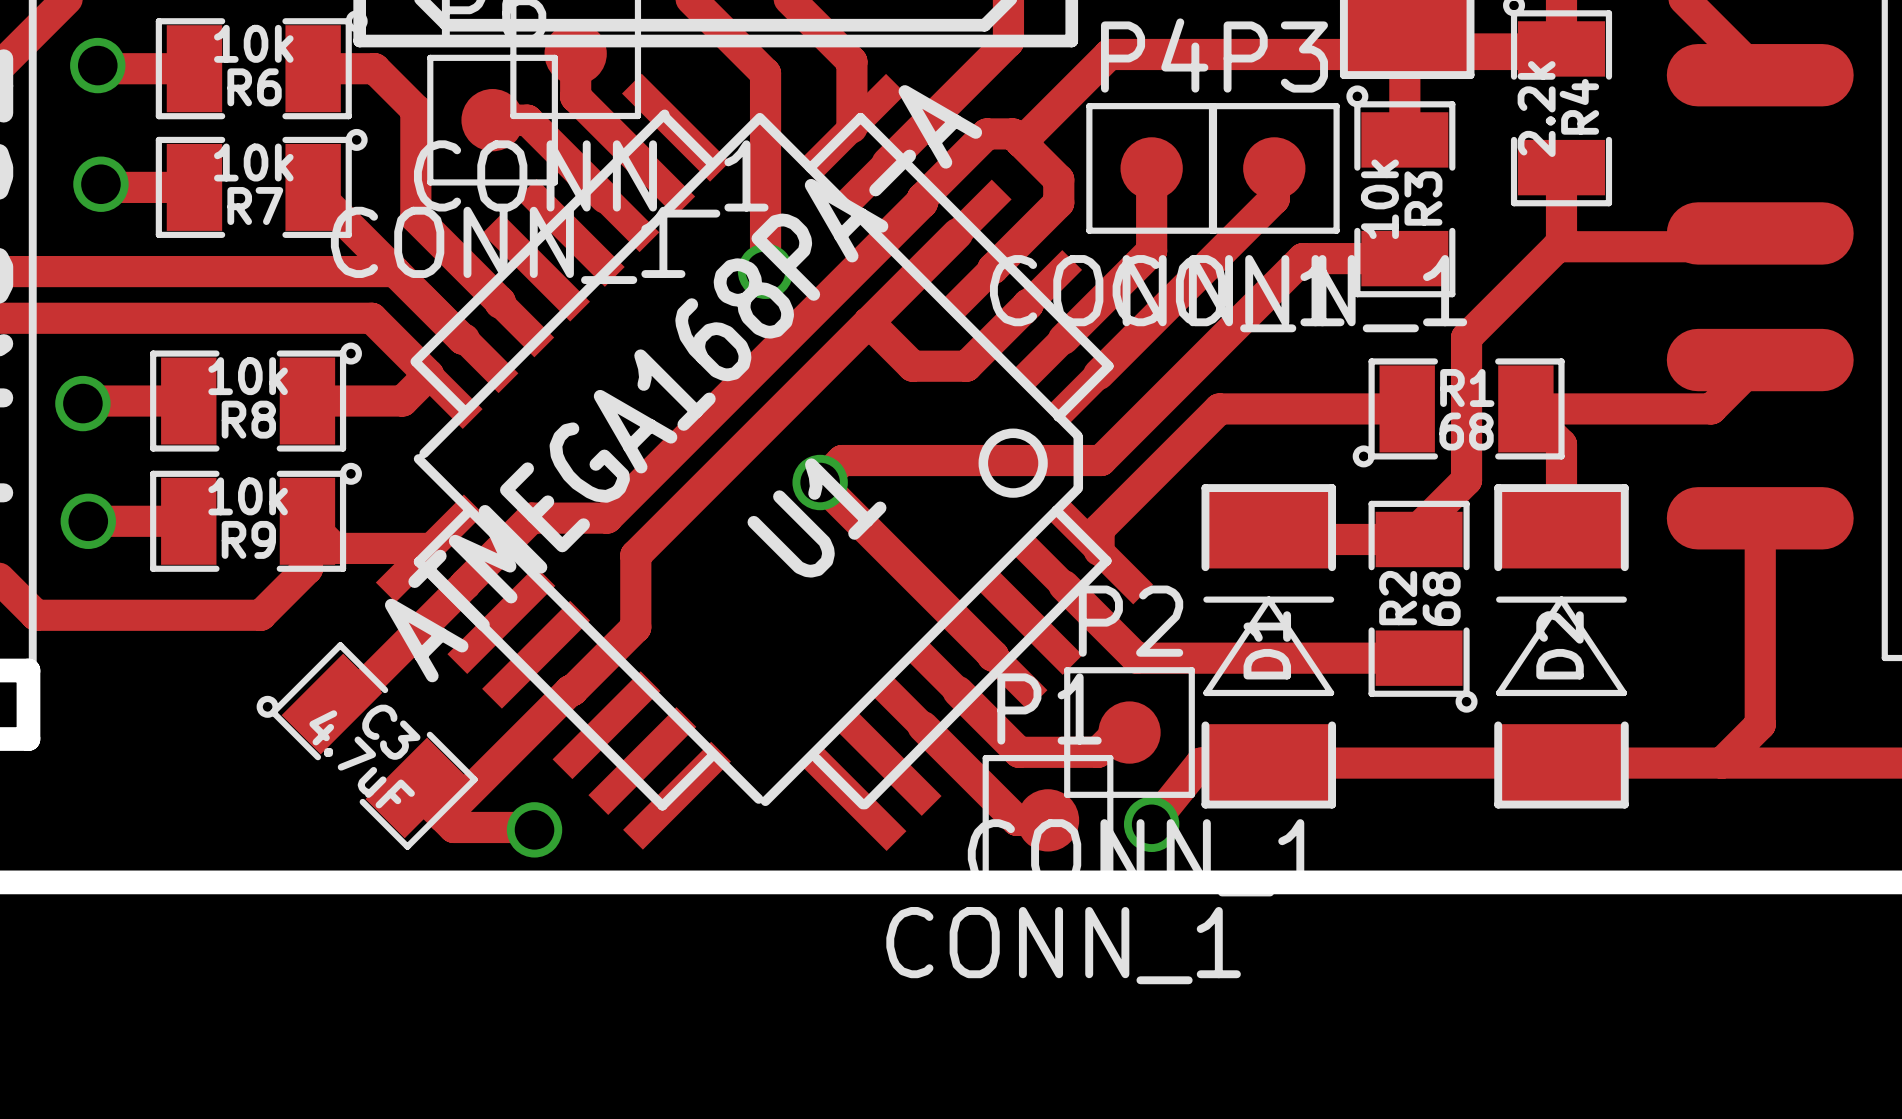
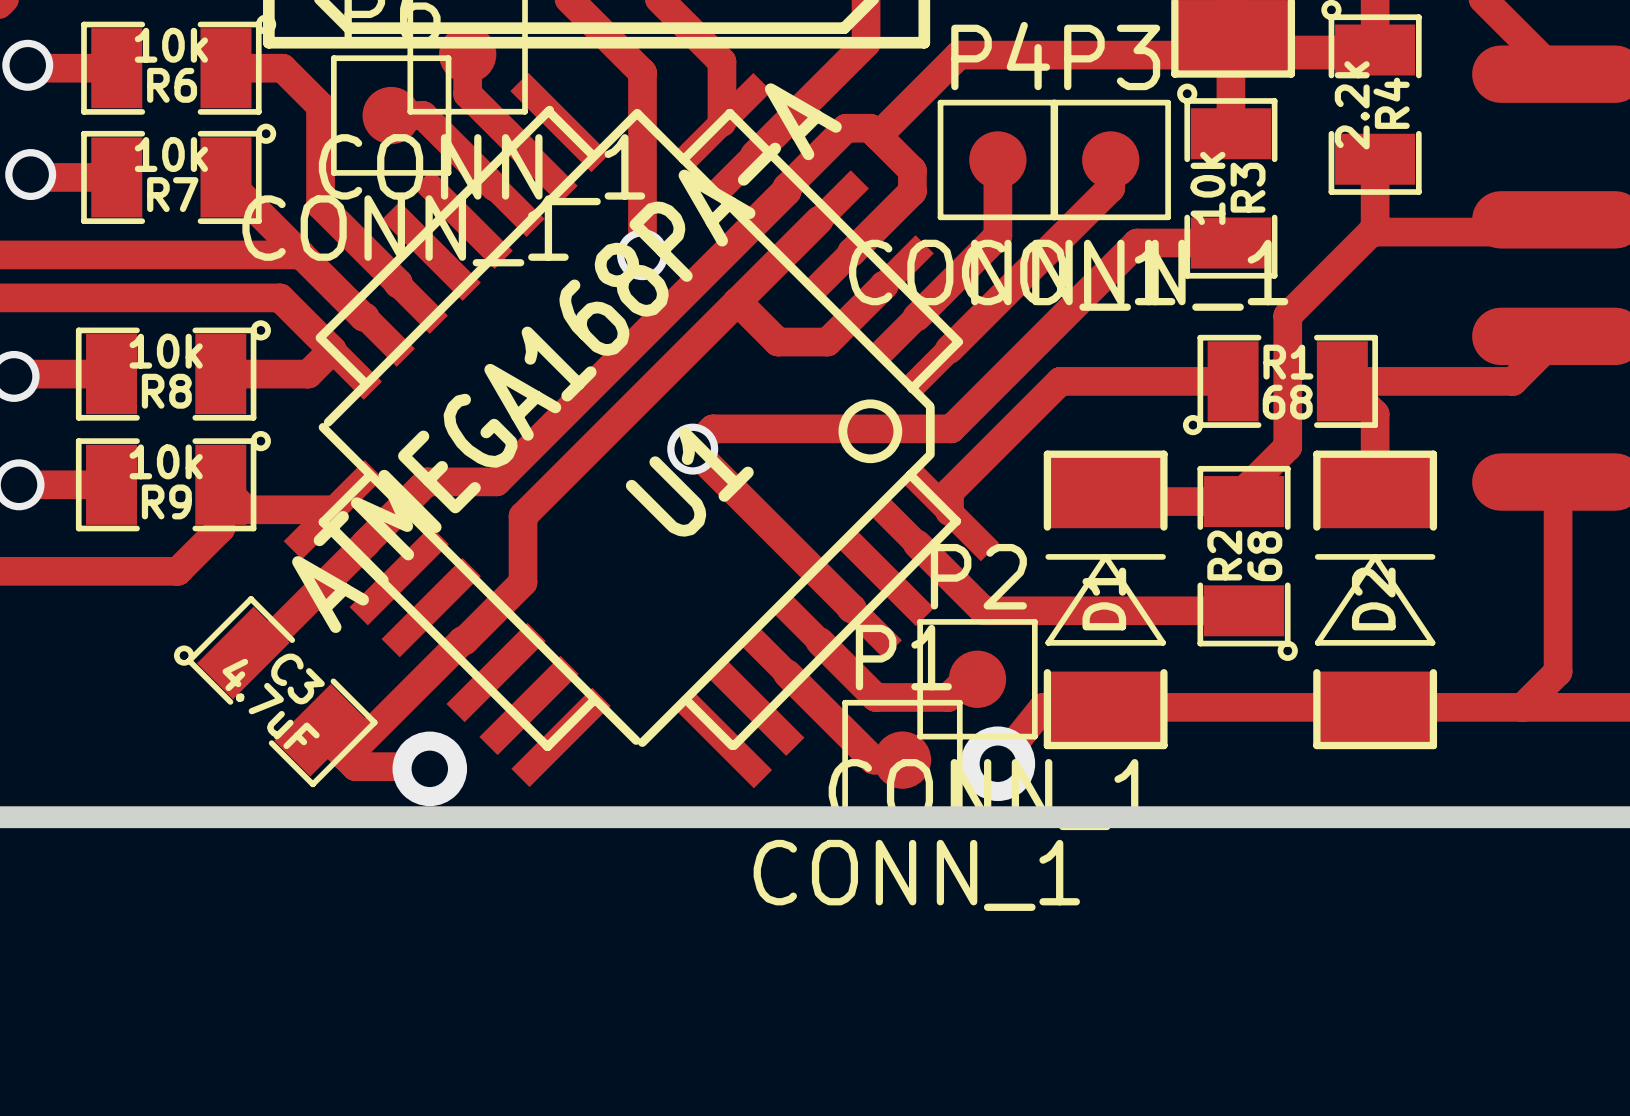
via size: [1123, 796, 1180, 853] -> [960, 726, 1036, 802]
via size: [506, 802, 563, 858] -> [392, 731, 468, 807]

